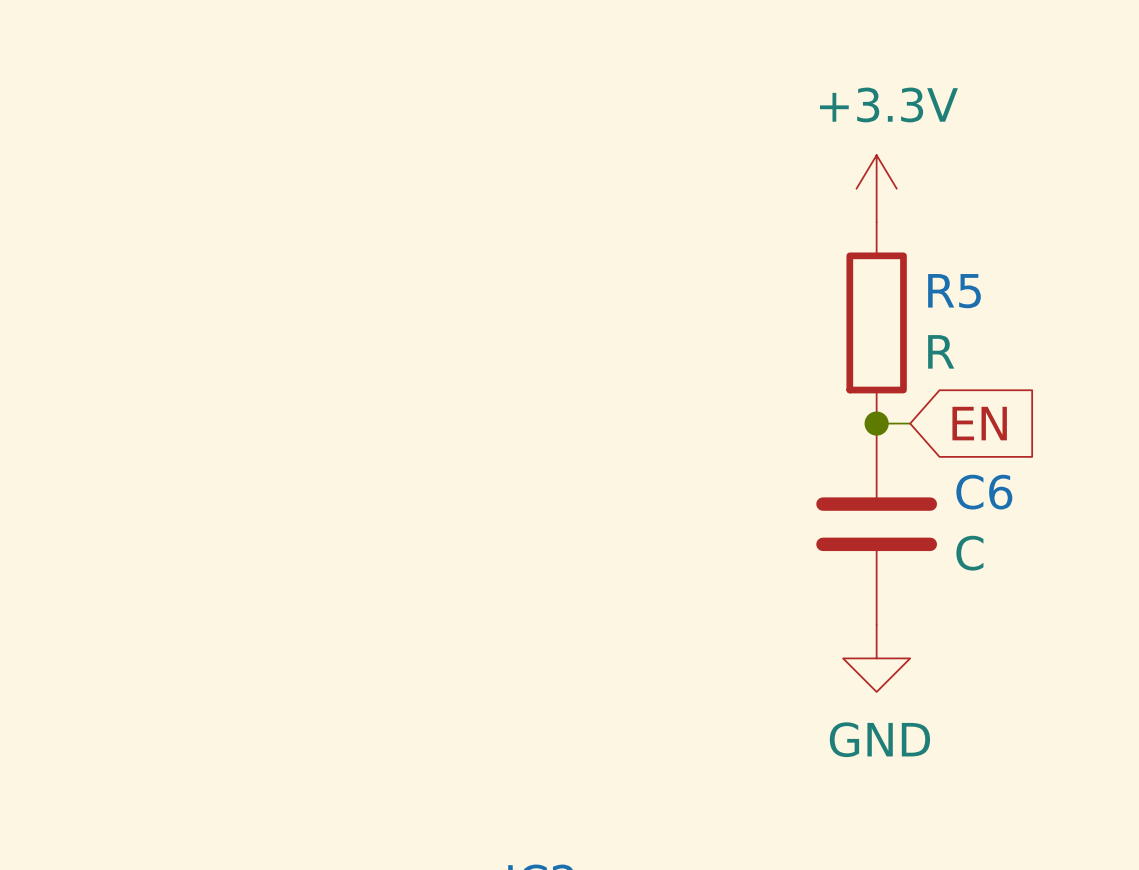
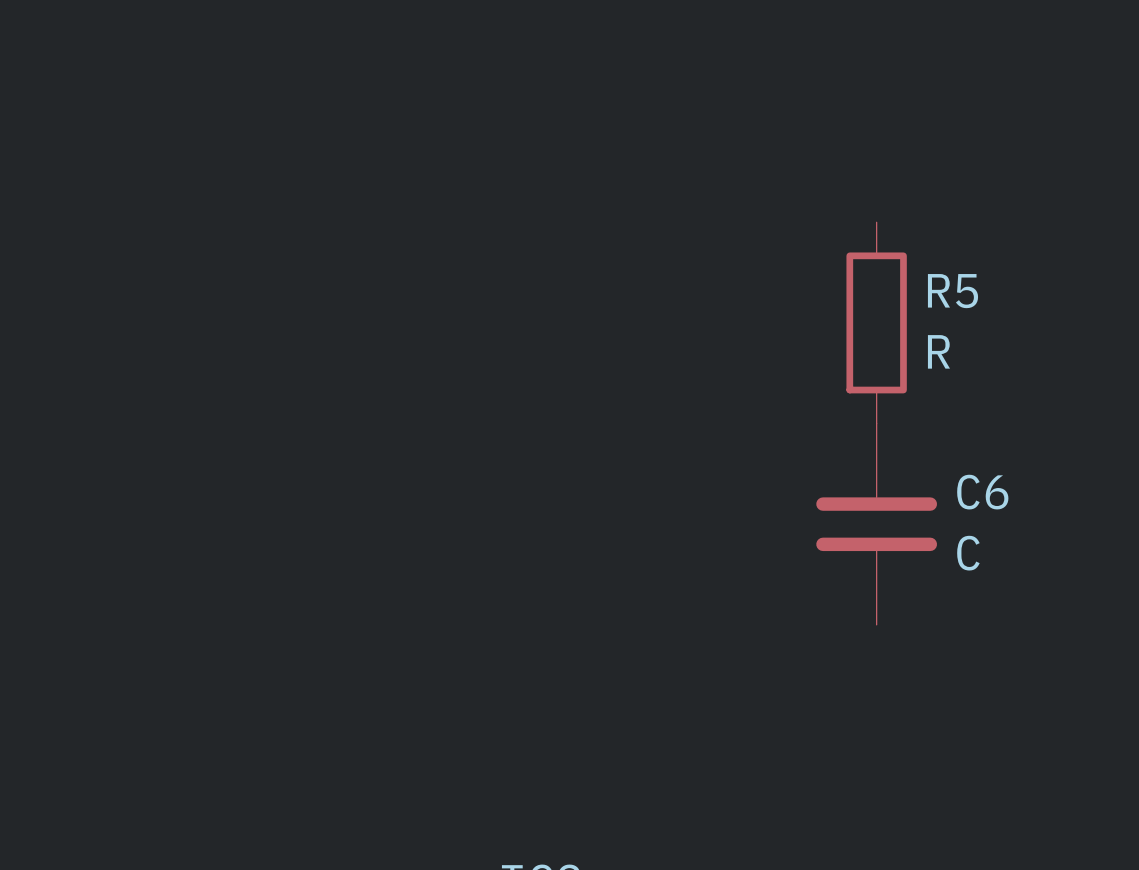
power symbol: +3.3V (876, 188) -> none
wire: (876, 423) (910, 423) -> none
junction: (876, 423) -> none
global label: EN (979, 423) -> none
power symbol: GND (876, 658) -> none

